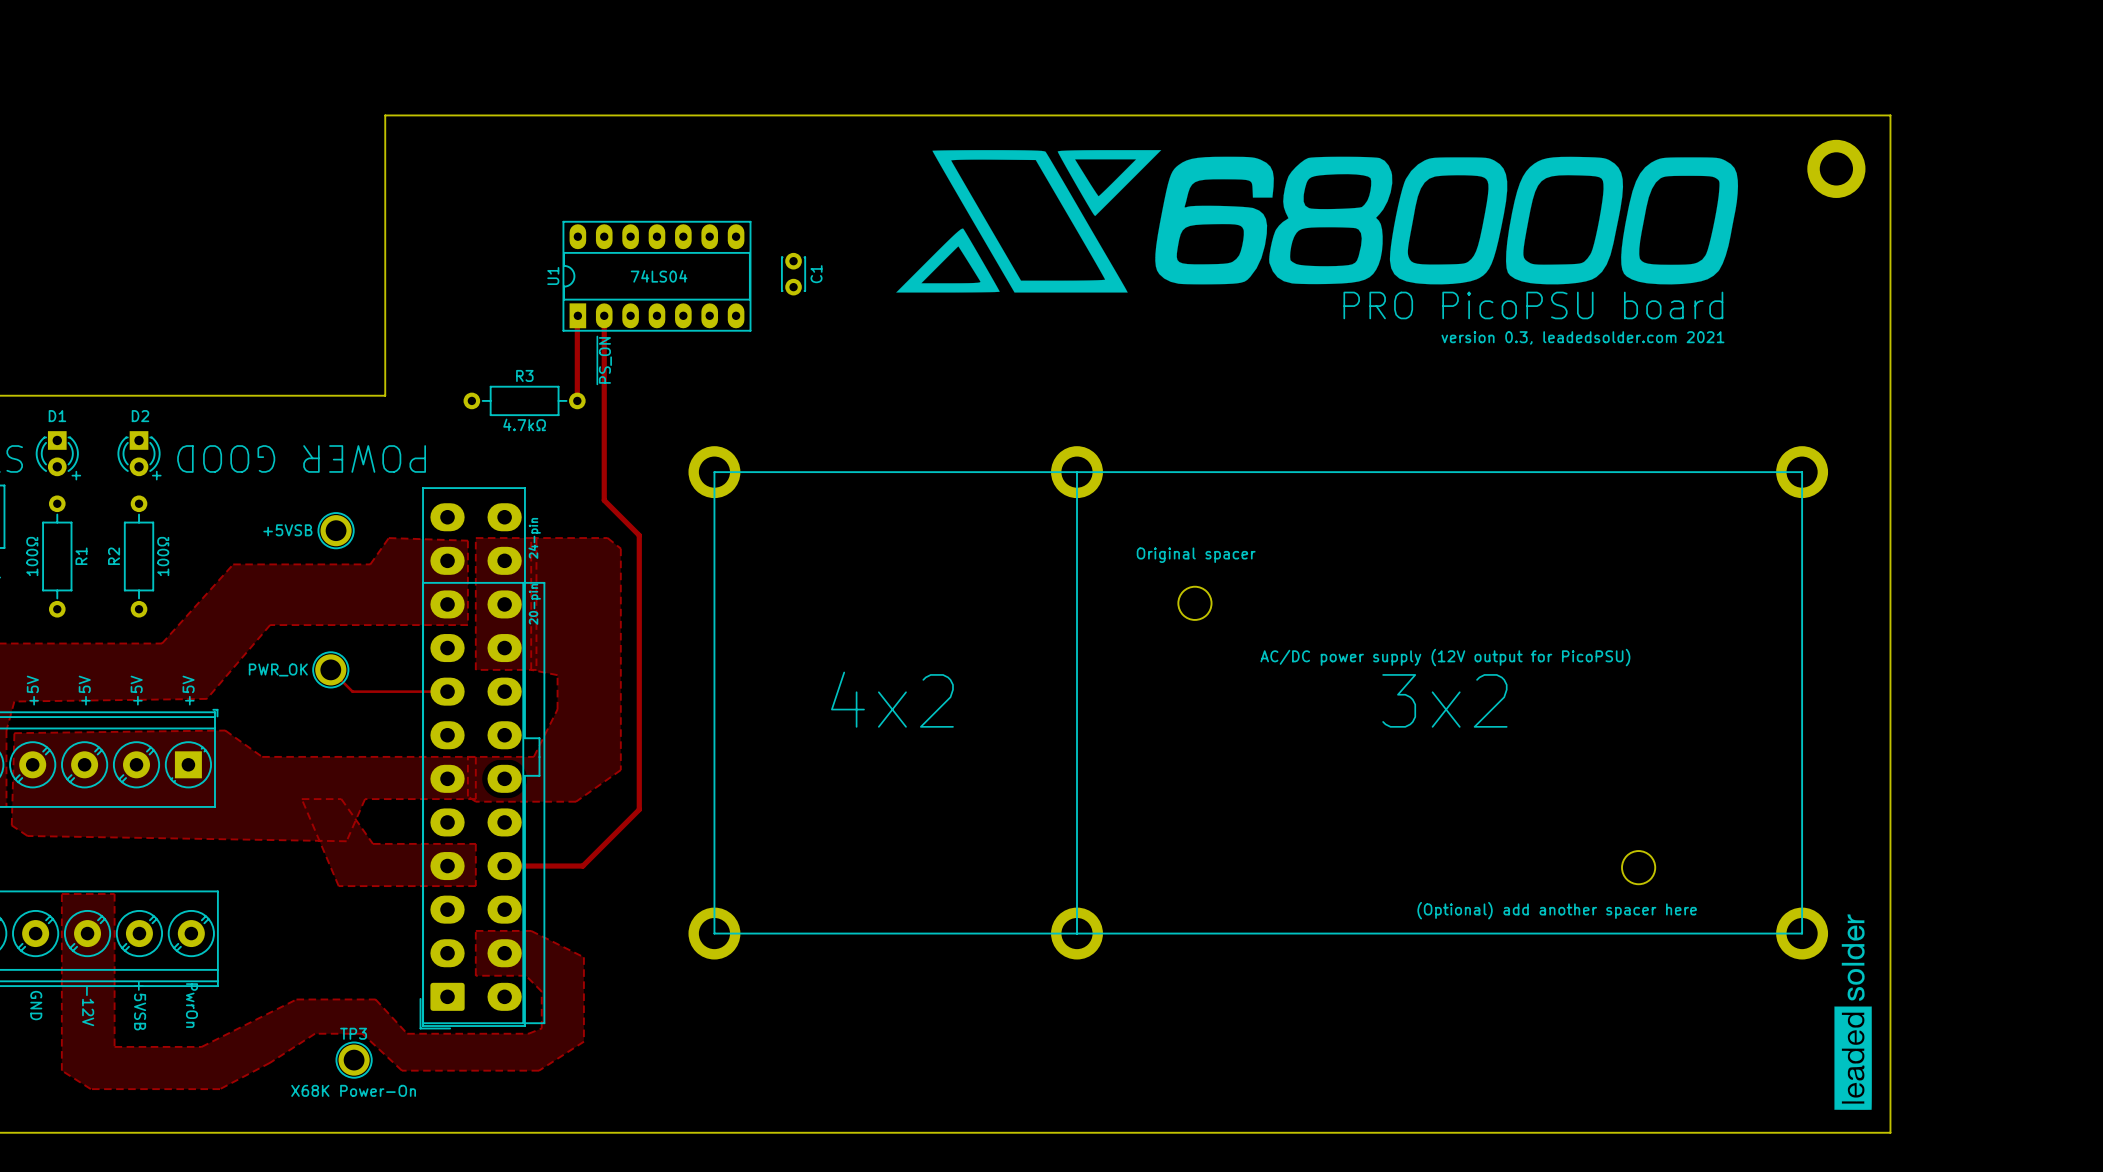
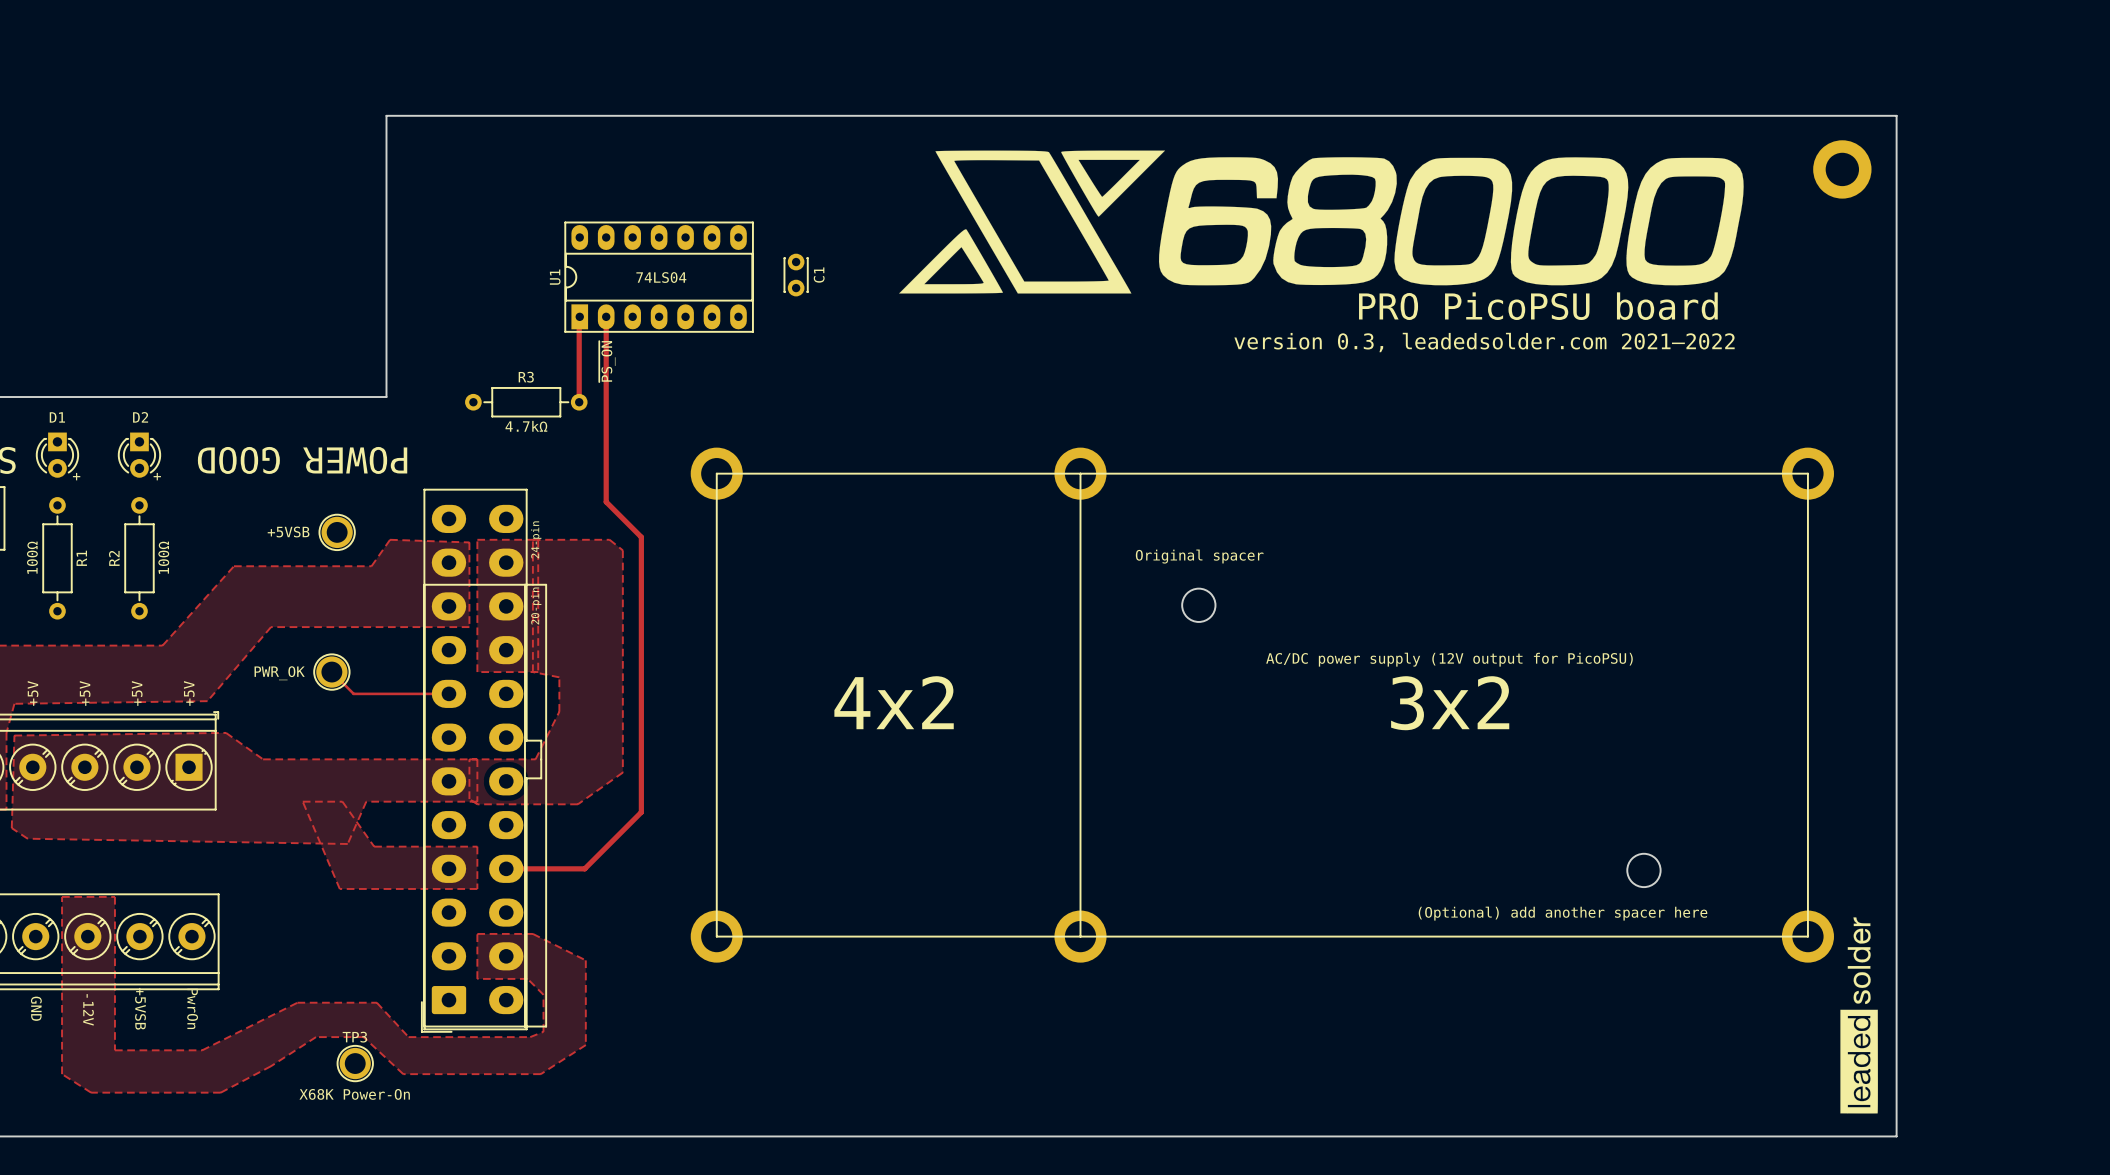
text: version 0.3, leadedsolder.com 2021 (1582, 337) -> version 0.3, leadedsolder.com 2021–2022 (1484, 342)

